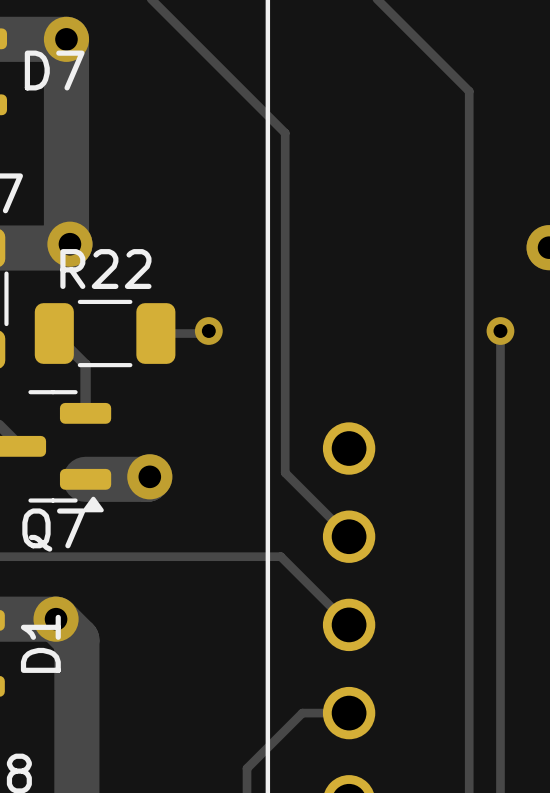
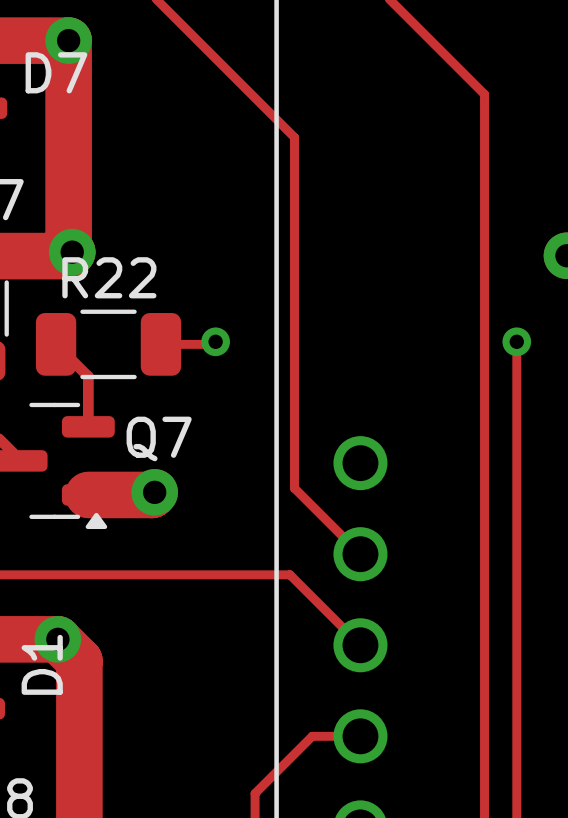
Q7 name position: Q7 (53, 530) -> Q7 (159, 438)

